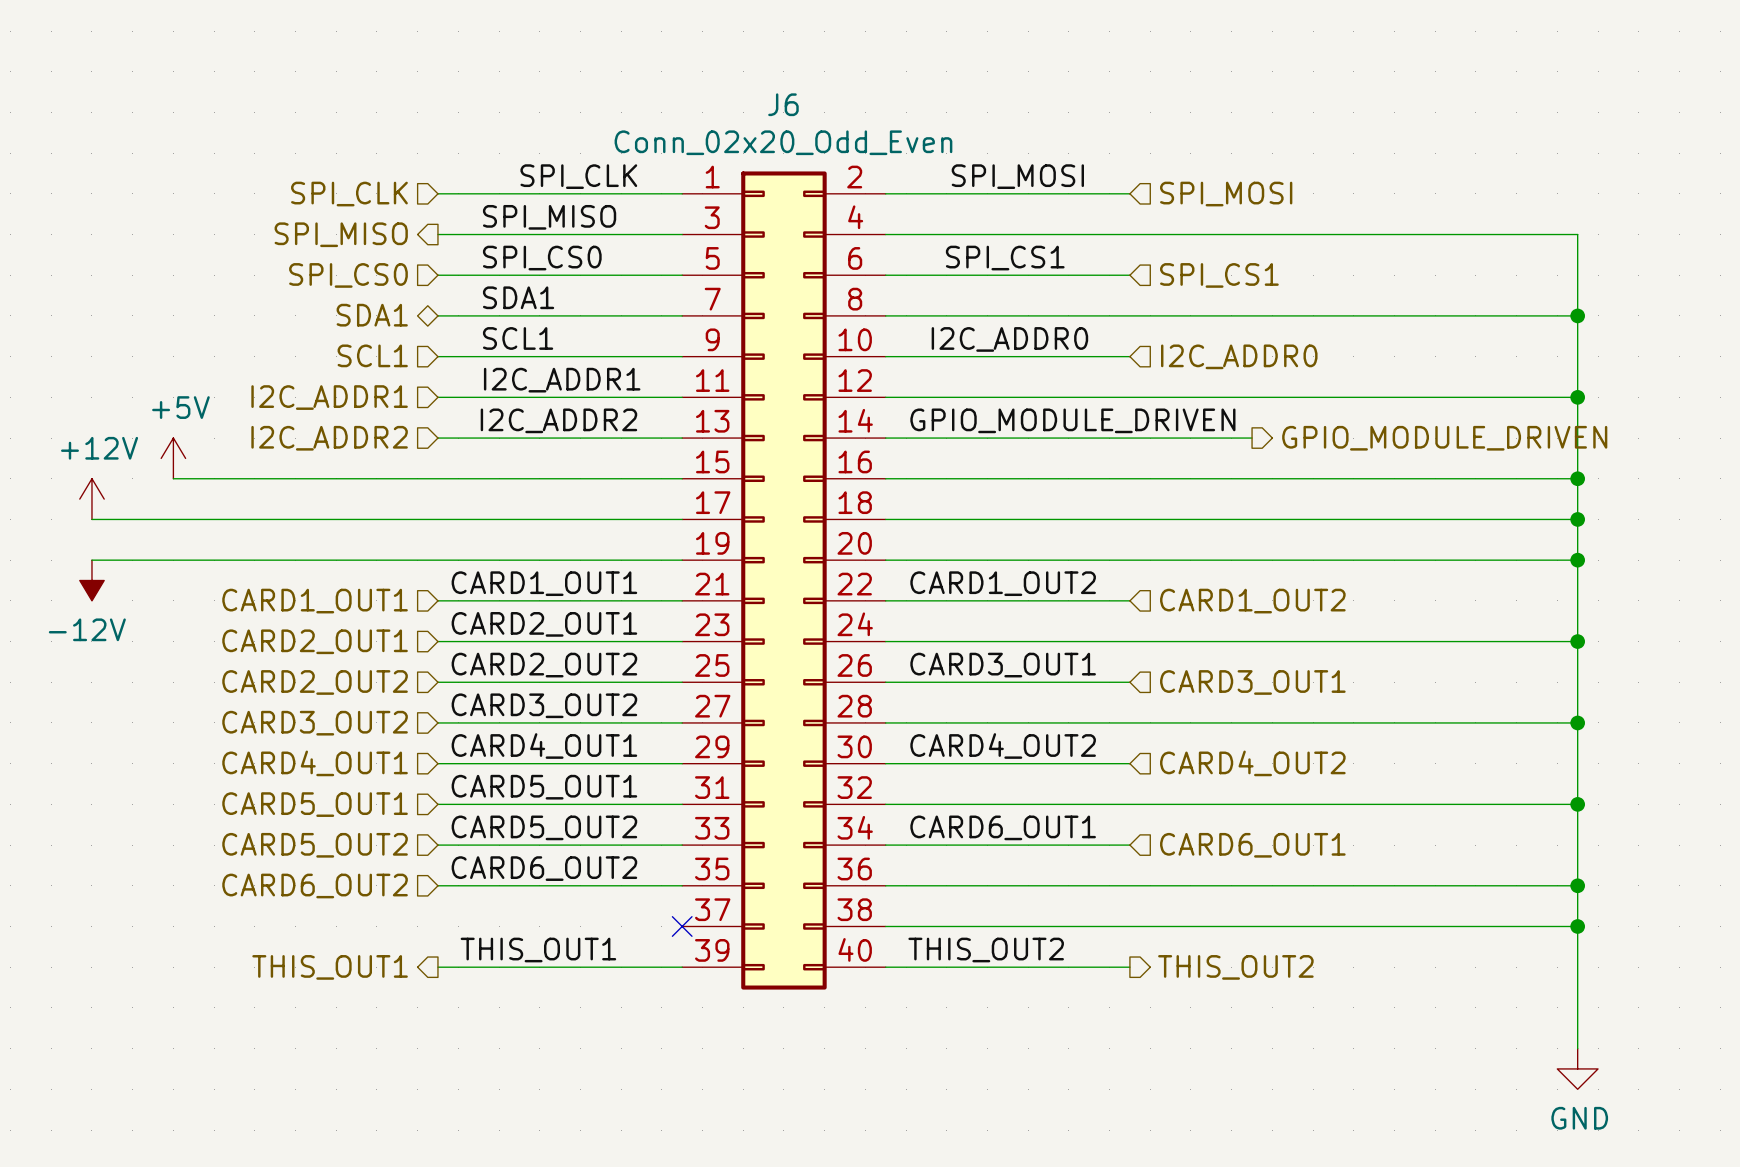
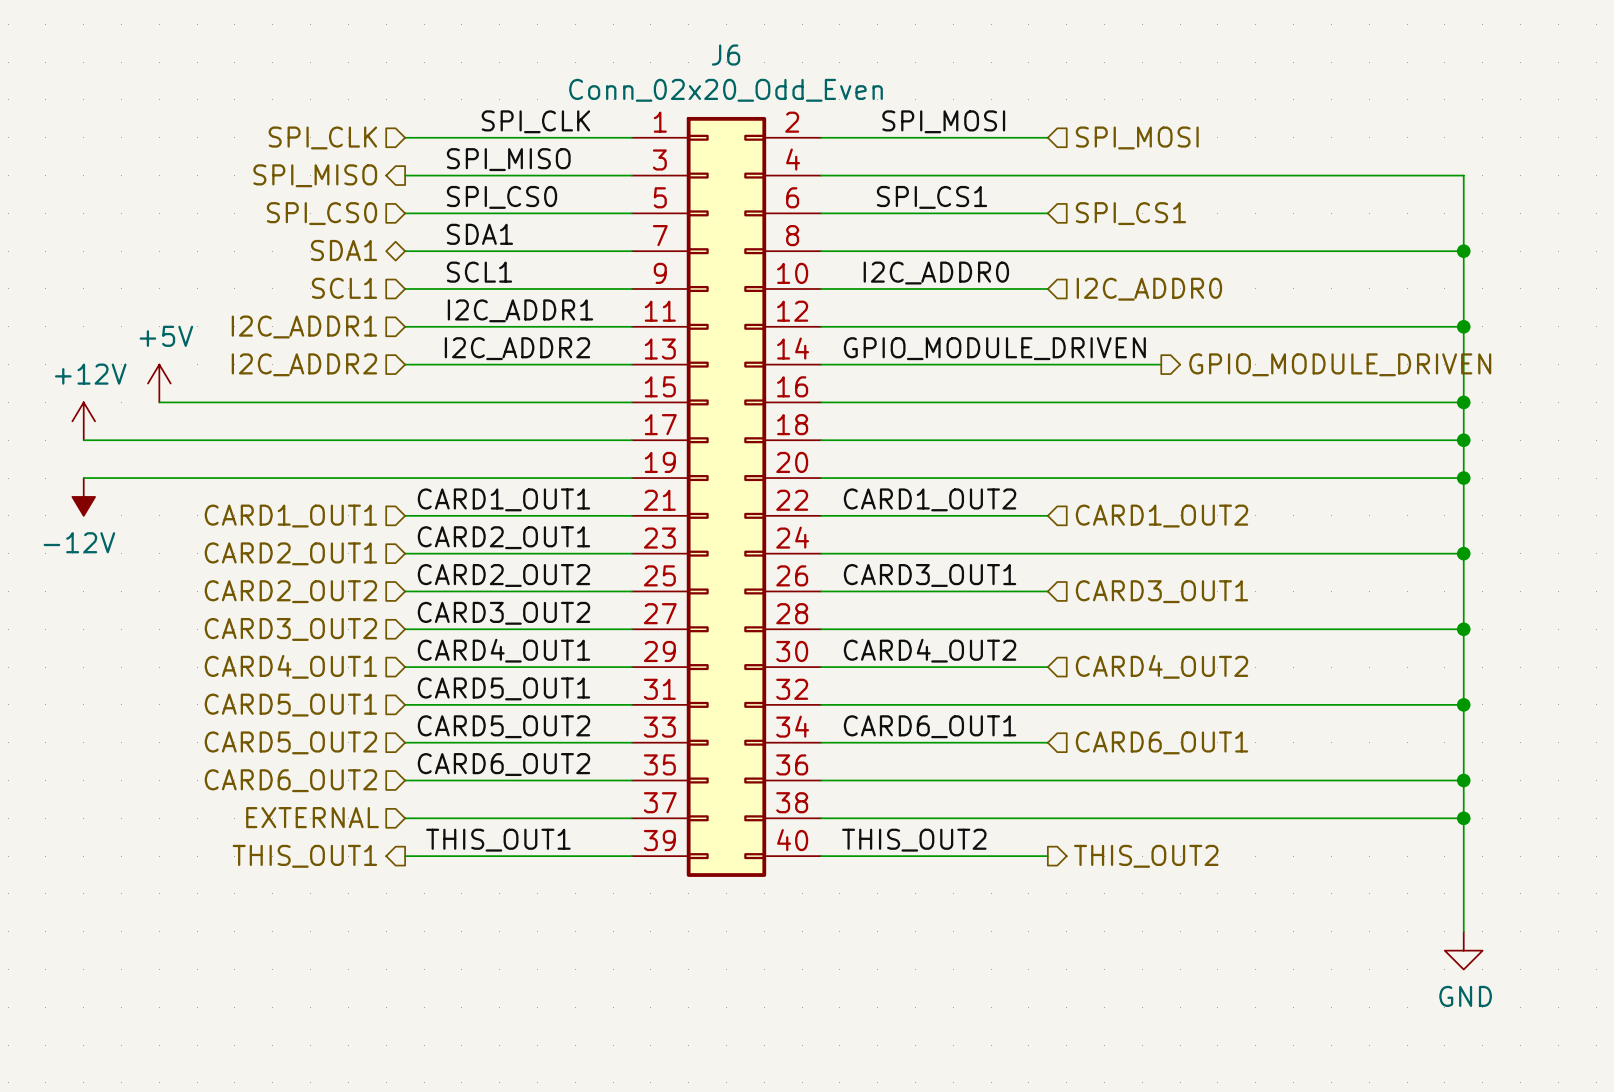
hierarchical label: none -> EXTERNAL (312, 817)
wire: none -> (405, 818) (631, 818)
no-connect mark: (682, 926) -> none

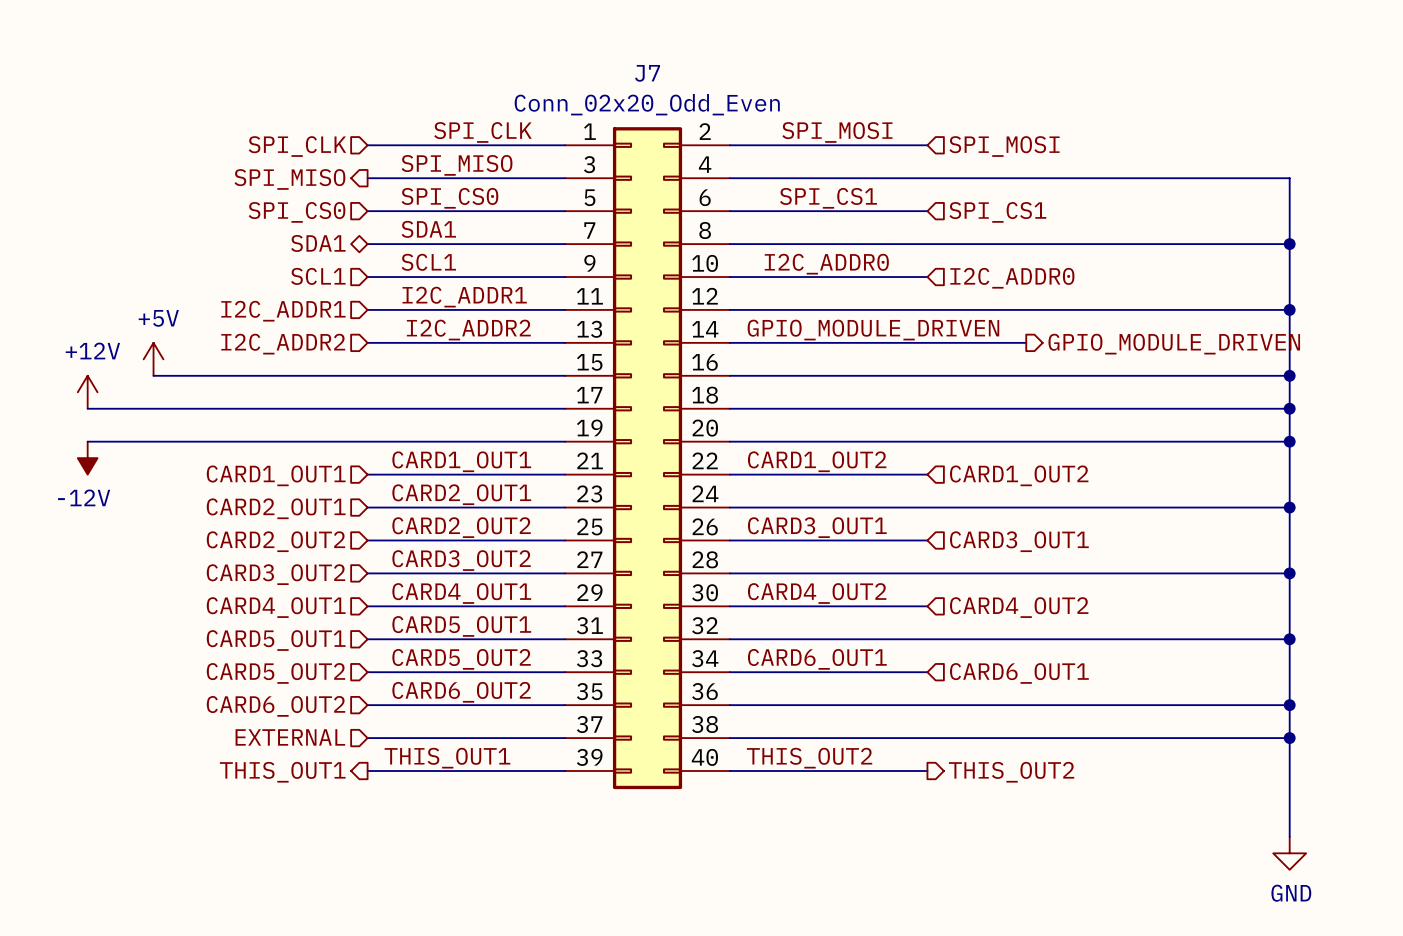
J6 name: J6 (726, 55) -> J7 (647, 73)

